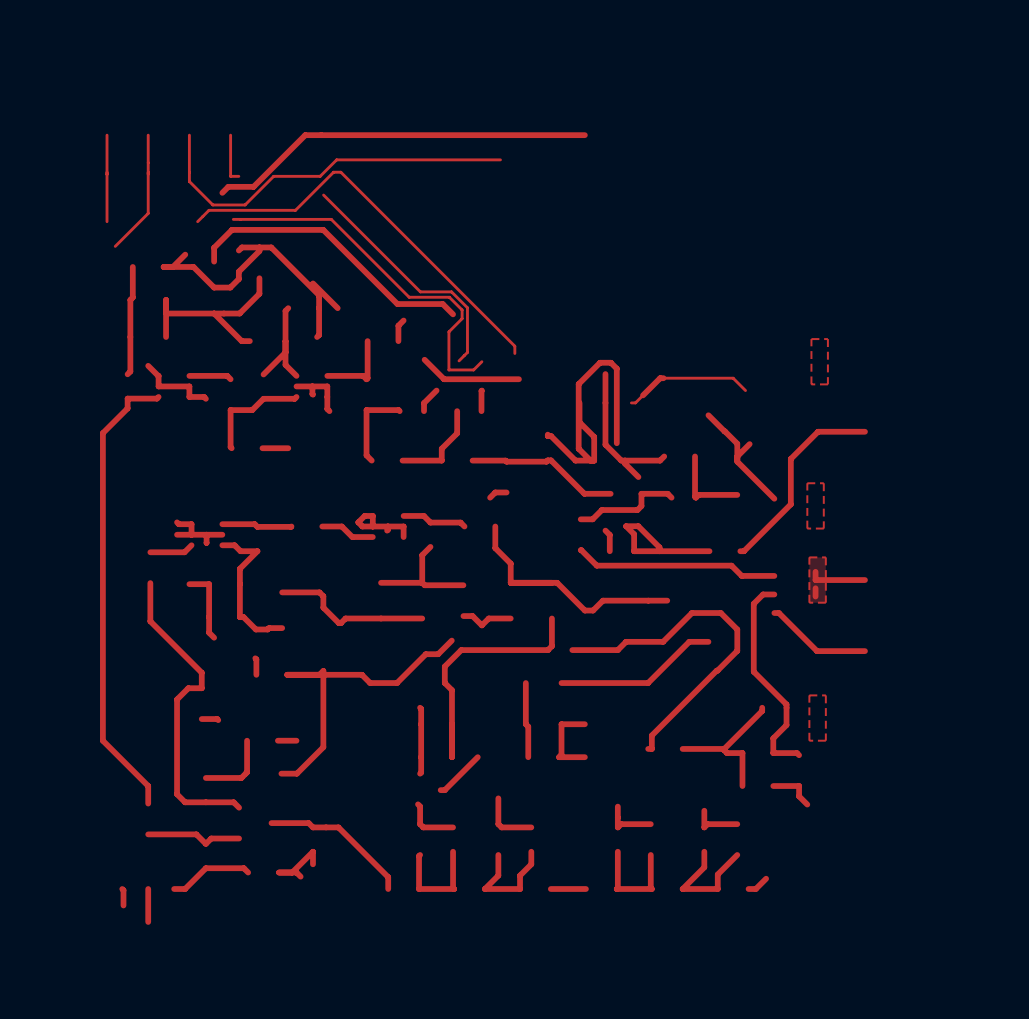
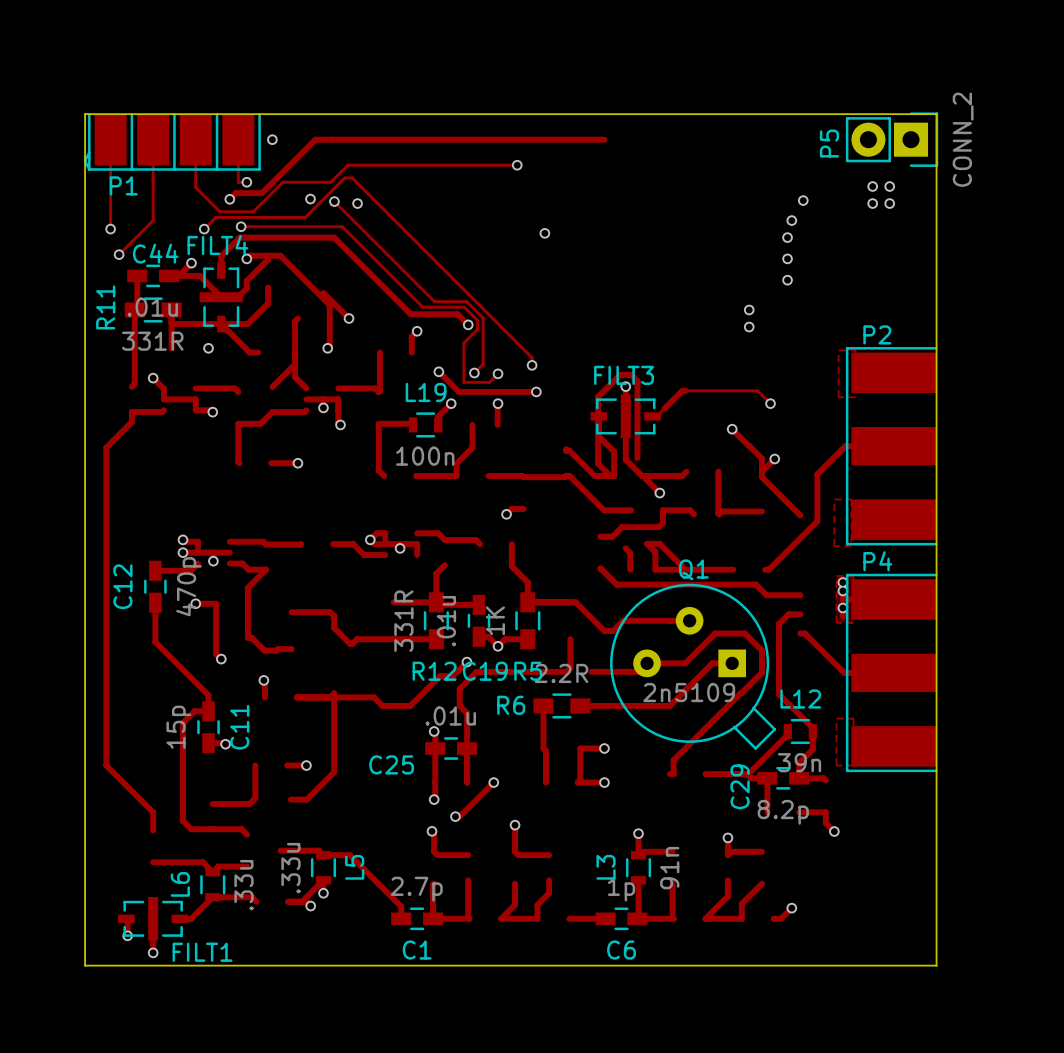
board edge: none -> (85, 114) (936, 114) (936, 965) (85, 965) (85, 114)
via: none -> (272, 139)
P5: none -> CONN_2 (892, 139)
P1: none -> (172, 141)
via: none -> (517, 165)
via: none -> (246, 182)
via: none -> (872, 186)
via: none -> (889, 186)
via: none -> (229, 199)
via: none -> (310, 199)
via: none -> (803, 200)
via: none -> (334, 201)
via: none -> (357, 203)
via: none -> (872, 203)
via: none -> (889, 203)
via: none -> (791, 220)
via: none -> (241, 226)
via: none -> (110, 229)
via: none -> (204, 229)
via: none -> (544, 233)
via: none -> (787, 237)
via: none -> (119, 254)
via: none -> (246, 258)
via: none -> (787, 258)
via: none -> (191, 263)
C44: none -> .01u (153, 275)
via: none -> (787, 280)
FILT4: none -> (221, 297)
R11: none -> 331R (153, 309)
via: none -> (749, 309)
via: none -> (349, 318)
via: none -> (468, 324)
via: none -> (749, 327)
via: none -> (417, 331)
via: none -> (208, 348)
via: none -> (327, 348)
via: none -> (532, 365)
via: none -> (438, 371)
via: none -> (474, 372)
via: none -> (498, 373)
via: none -> (153, 378)
via: none -> (625, 386)
via: none -> (536, 391)
via: none -> (451, 403)
via: none -> (498, 403)
via: none -> (770, 403)
via: none -> (323, 407)
via: none -> (212, 412)
FILT3: none -> (625, 416)
via: none -> (340, 424)
L19: none -> 100n (425, 424)
via: none -> (732, 429)
P2: none -> (891, 446)
via: none -> (774, 458)
via: none -> (297, 463)
via: none -> (659, 493)
via: none -> (506, 514)
via: none -> (182, 539)
via: none -> (370, 539)
via: none -> (400, 548)
via: none -> (182, 552)
via: none -> (213, 561)
via: none -> (842, 582)
C12: none -> 470p (155, 586)
via: none -> (842, 590)
via: none -> (195, 603)
via: none -> (842, 608)
R12: none -> 331R (436, 620)
C19: none -> .01u (478, 620)
R5: none -> 1K (527, 620)
via: none -> (498, 646)
via: none -> (221, 659)
via: none -> (466, 662)
Q1: none -> 2n5109 (693, 666)
P4: none -> (891, 672)
via: none -> (263, 680)
R6: none -> 2.2R (561, 705)
C11: none -> 15p (208, 727)
via: none -> (434, 731)
L12: none -> 39n (800, 731)
via: none -> (225, 744)
C25: none -> .01u (451, 748)
via: none -> (604, 748)
via: none -> (306, 765)
C29: none -> 8.2p (783, 778)
via: none -> (493, 782)
via: none -> (604, 782)
via: none -> (434, 799)
via: none -> (455, 816)
via: none -> (515, 825)
via: none -> (432, 831)
via: none -> (834, 831)
via: none -> (638, 833)
via: none -> (727, 837)
L5: none -> .33u (323, 867)
L3: none -> 91n (638, 867)
L6: none -> .33u (212, 884)
via: none -> (323, 893)
via: none -> (310, 906)
via: none -> (791, 908)
FILT1: none -> (153, 918)
C1: none -> 2.7p (417, 918)
C6: none -> 1p (621, 918)
via: none -> (127, 935)
via: none -> (153, 952)

